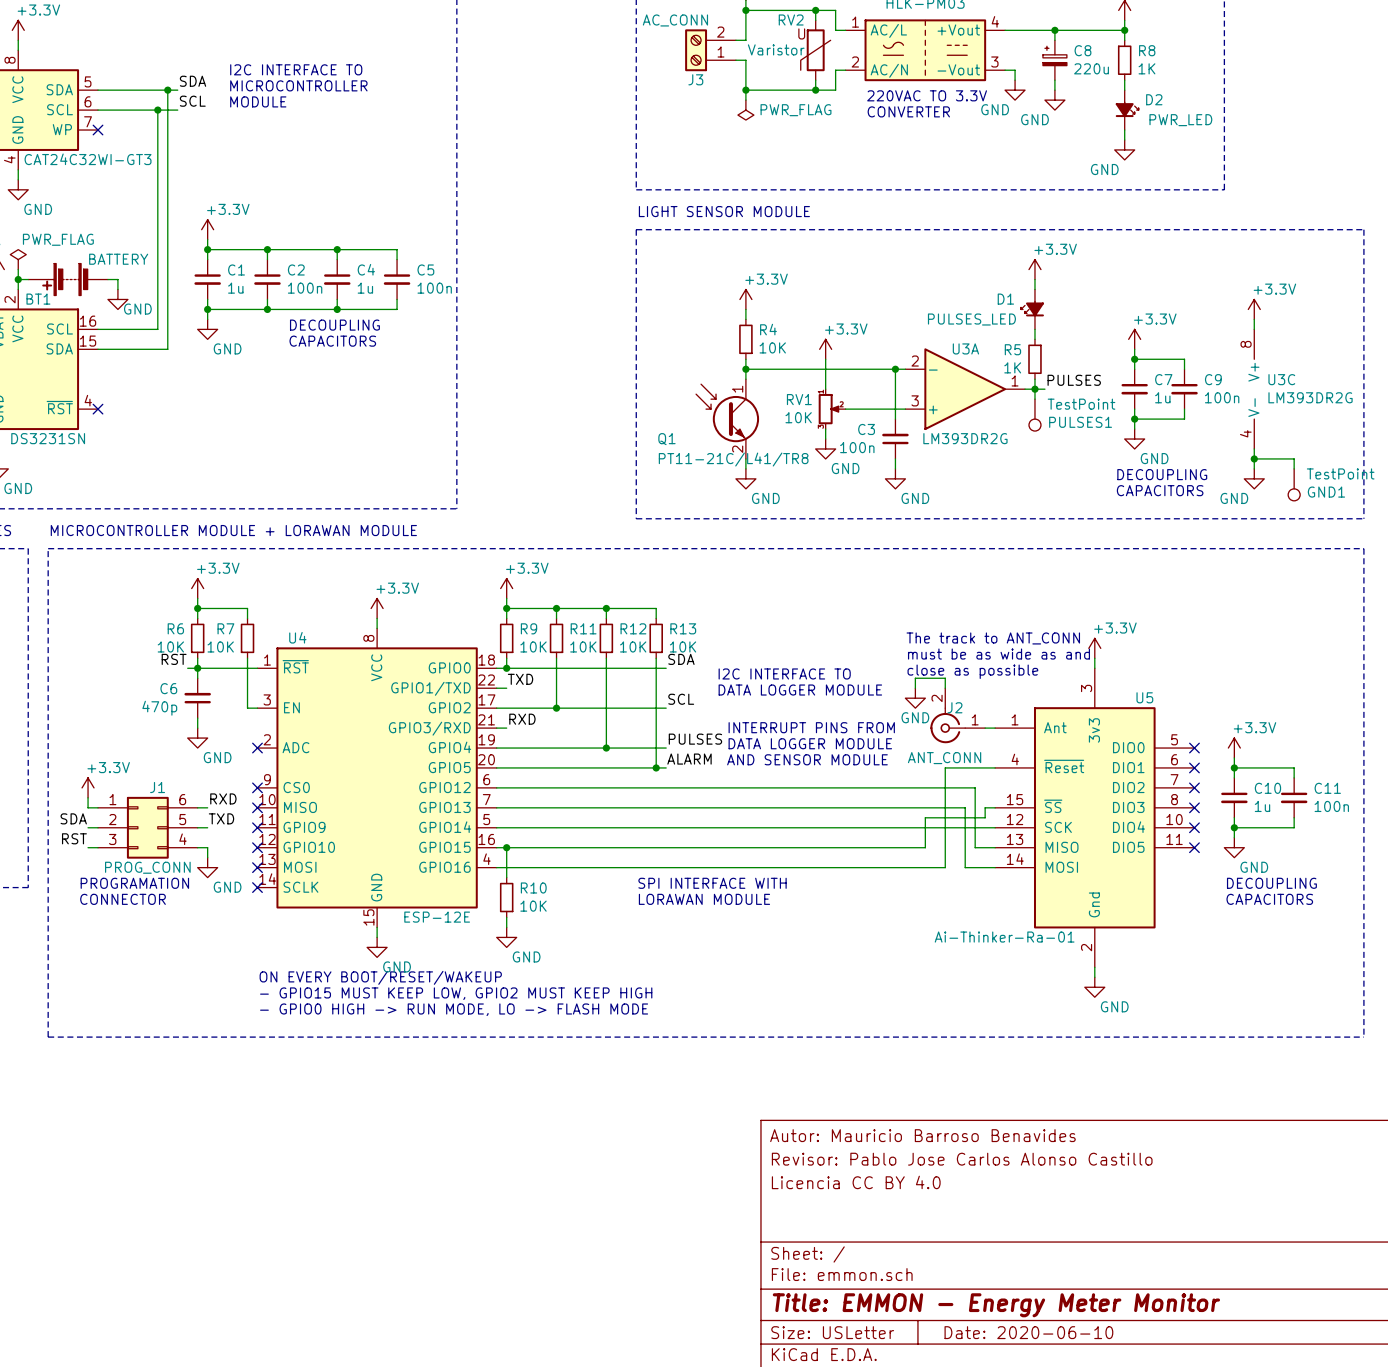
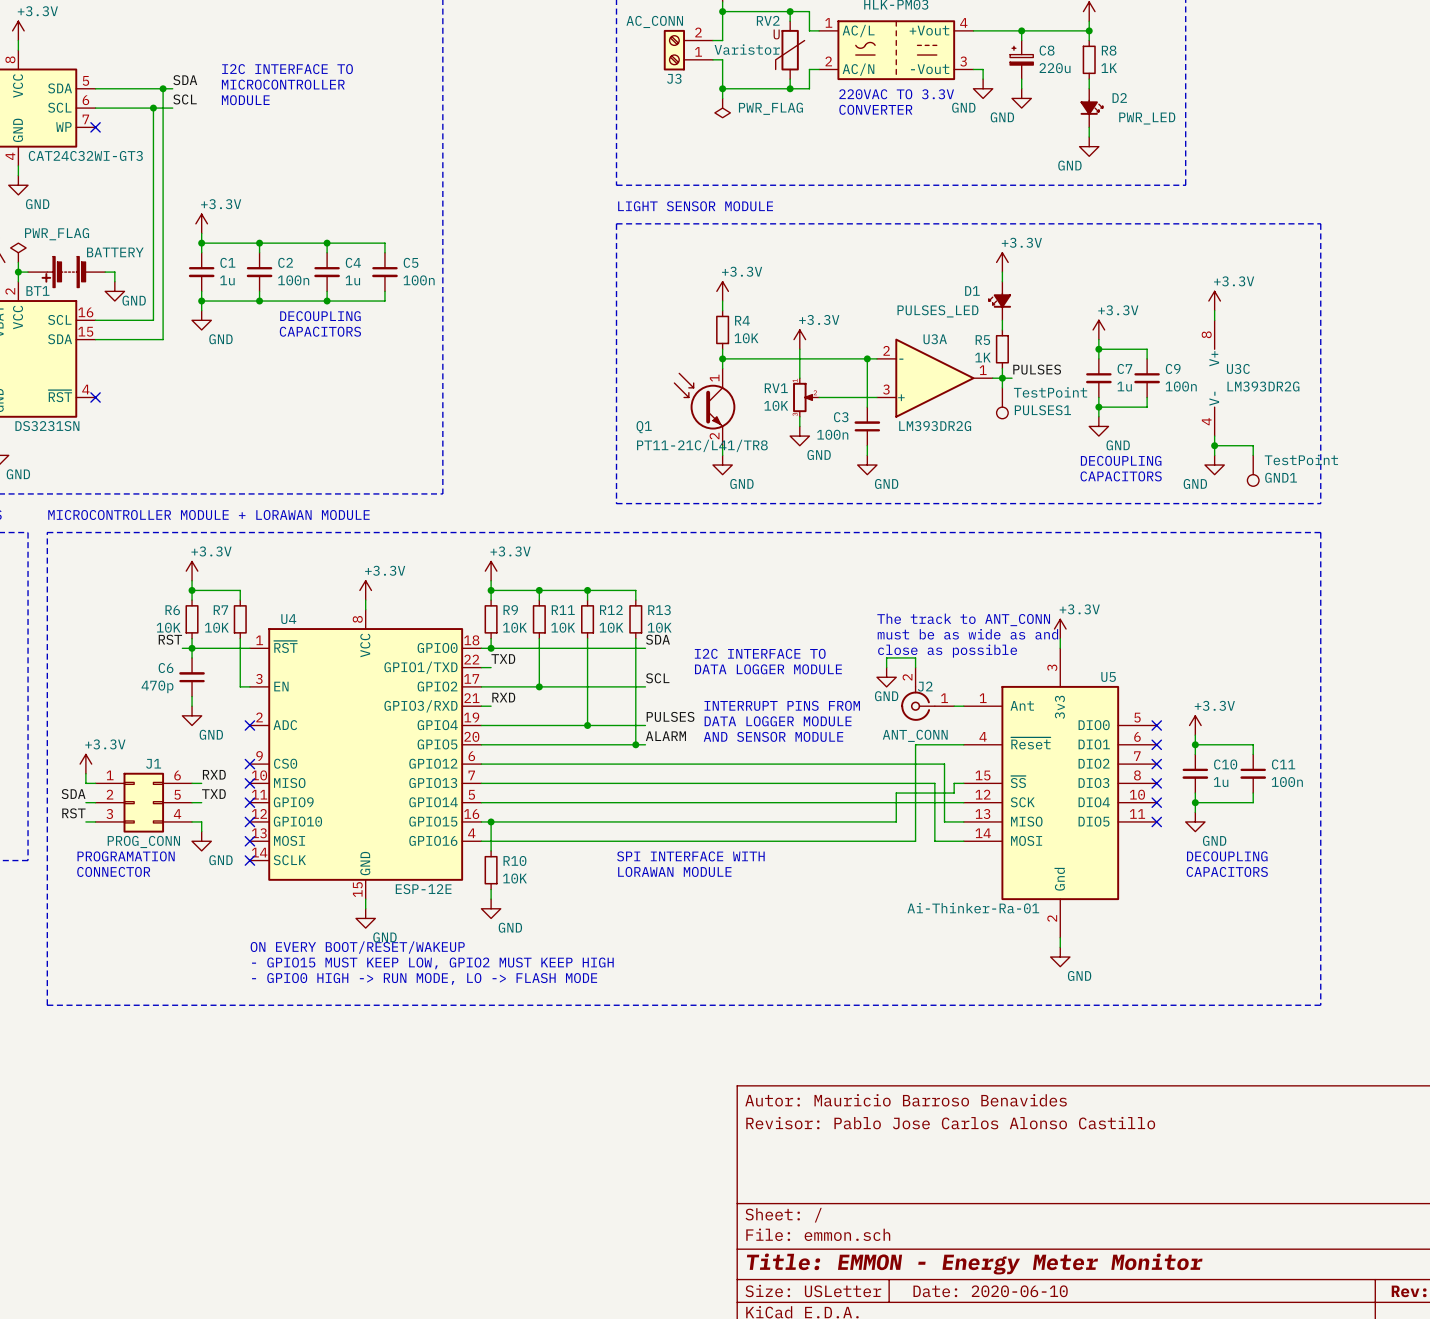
title block: Licencia CC BY 4.0 (856, 1182) -> none

